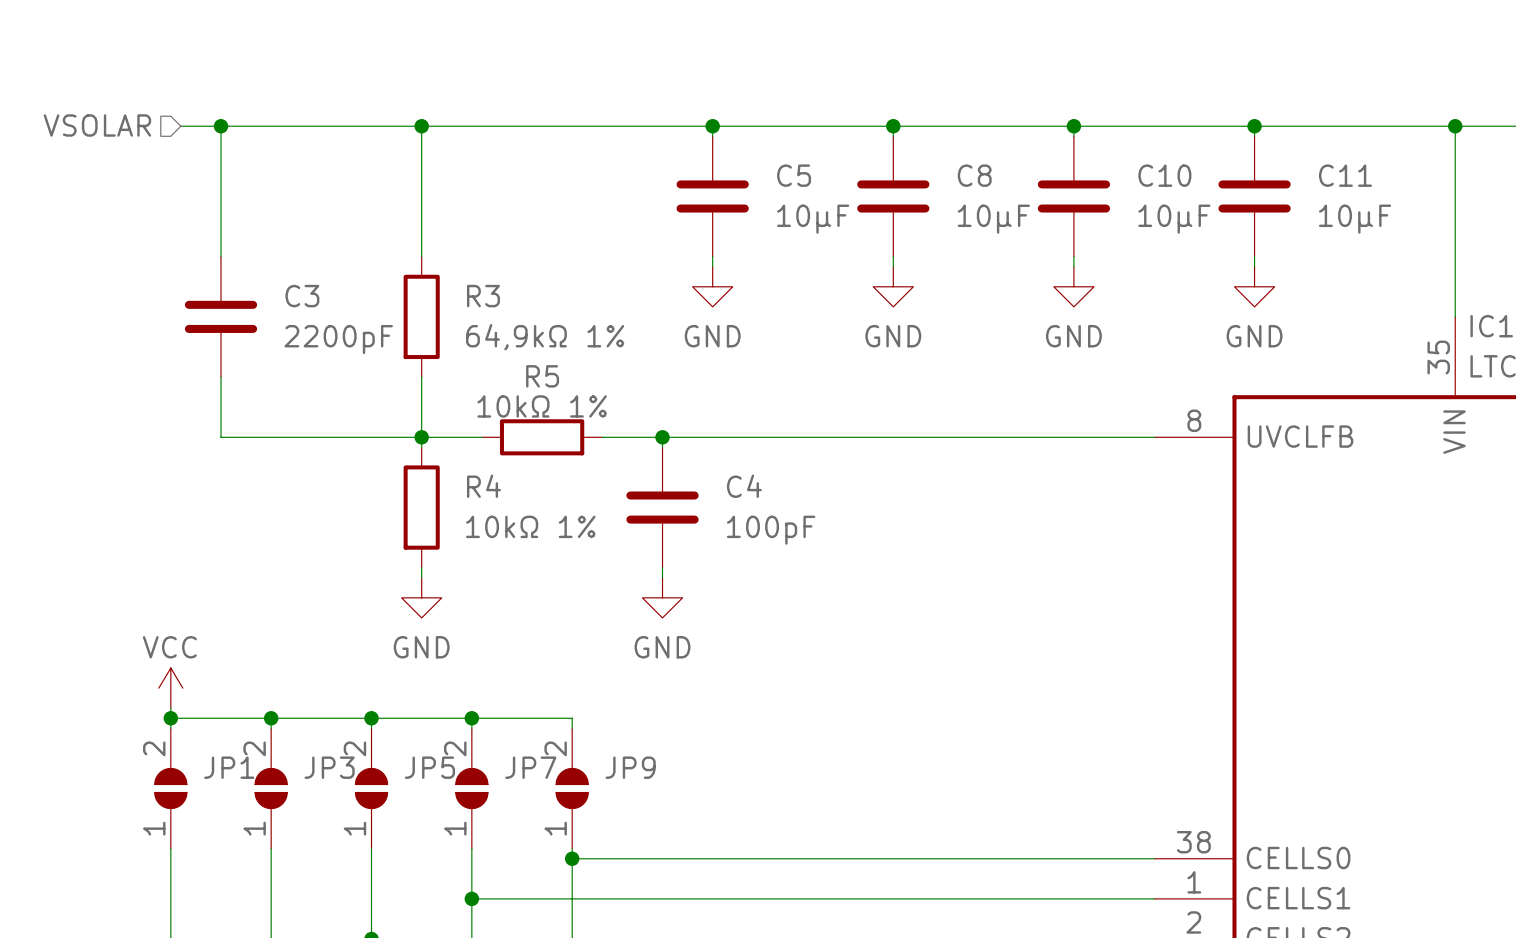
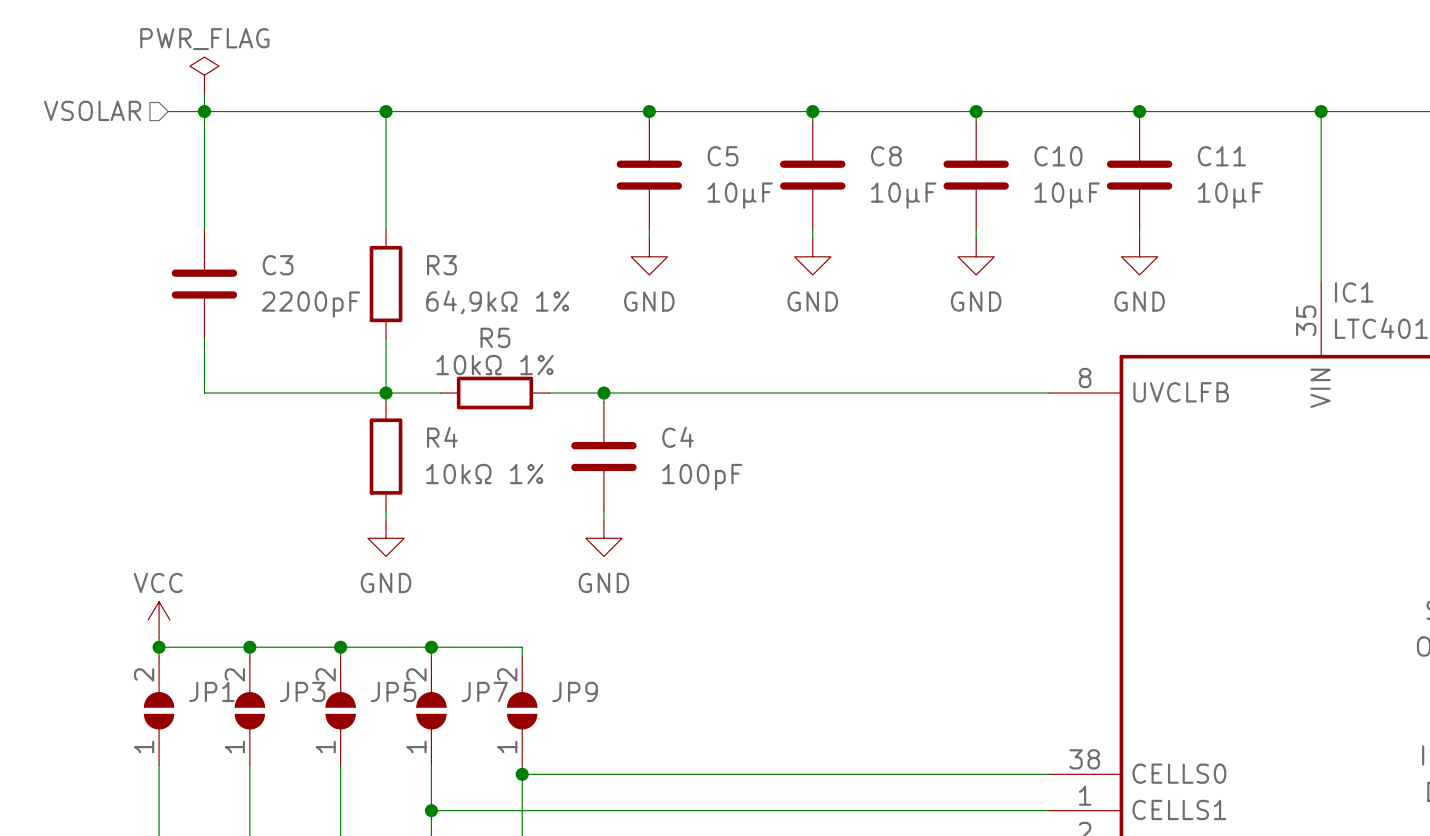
power symbol: none -> PWR_FLAG (204, 75)
wire: none -> (204, 93) (204, 111)

